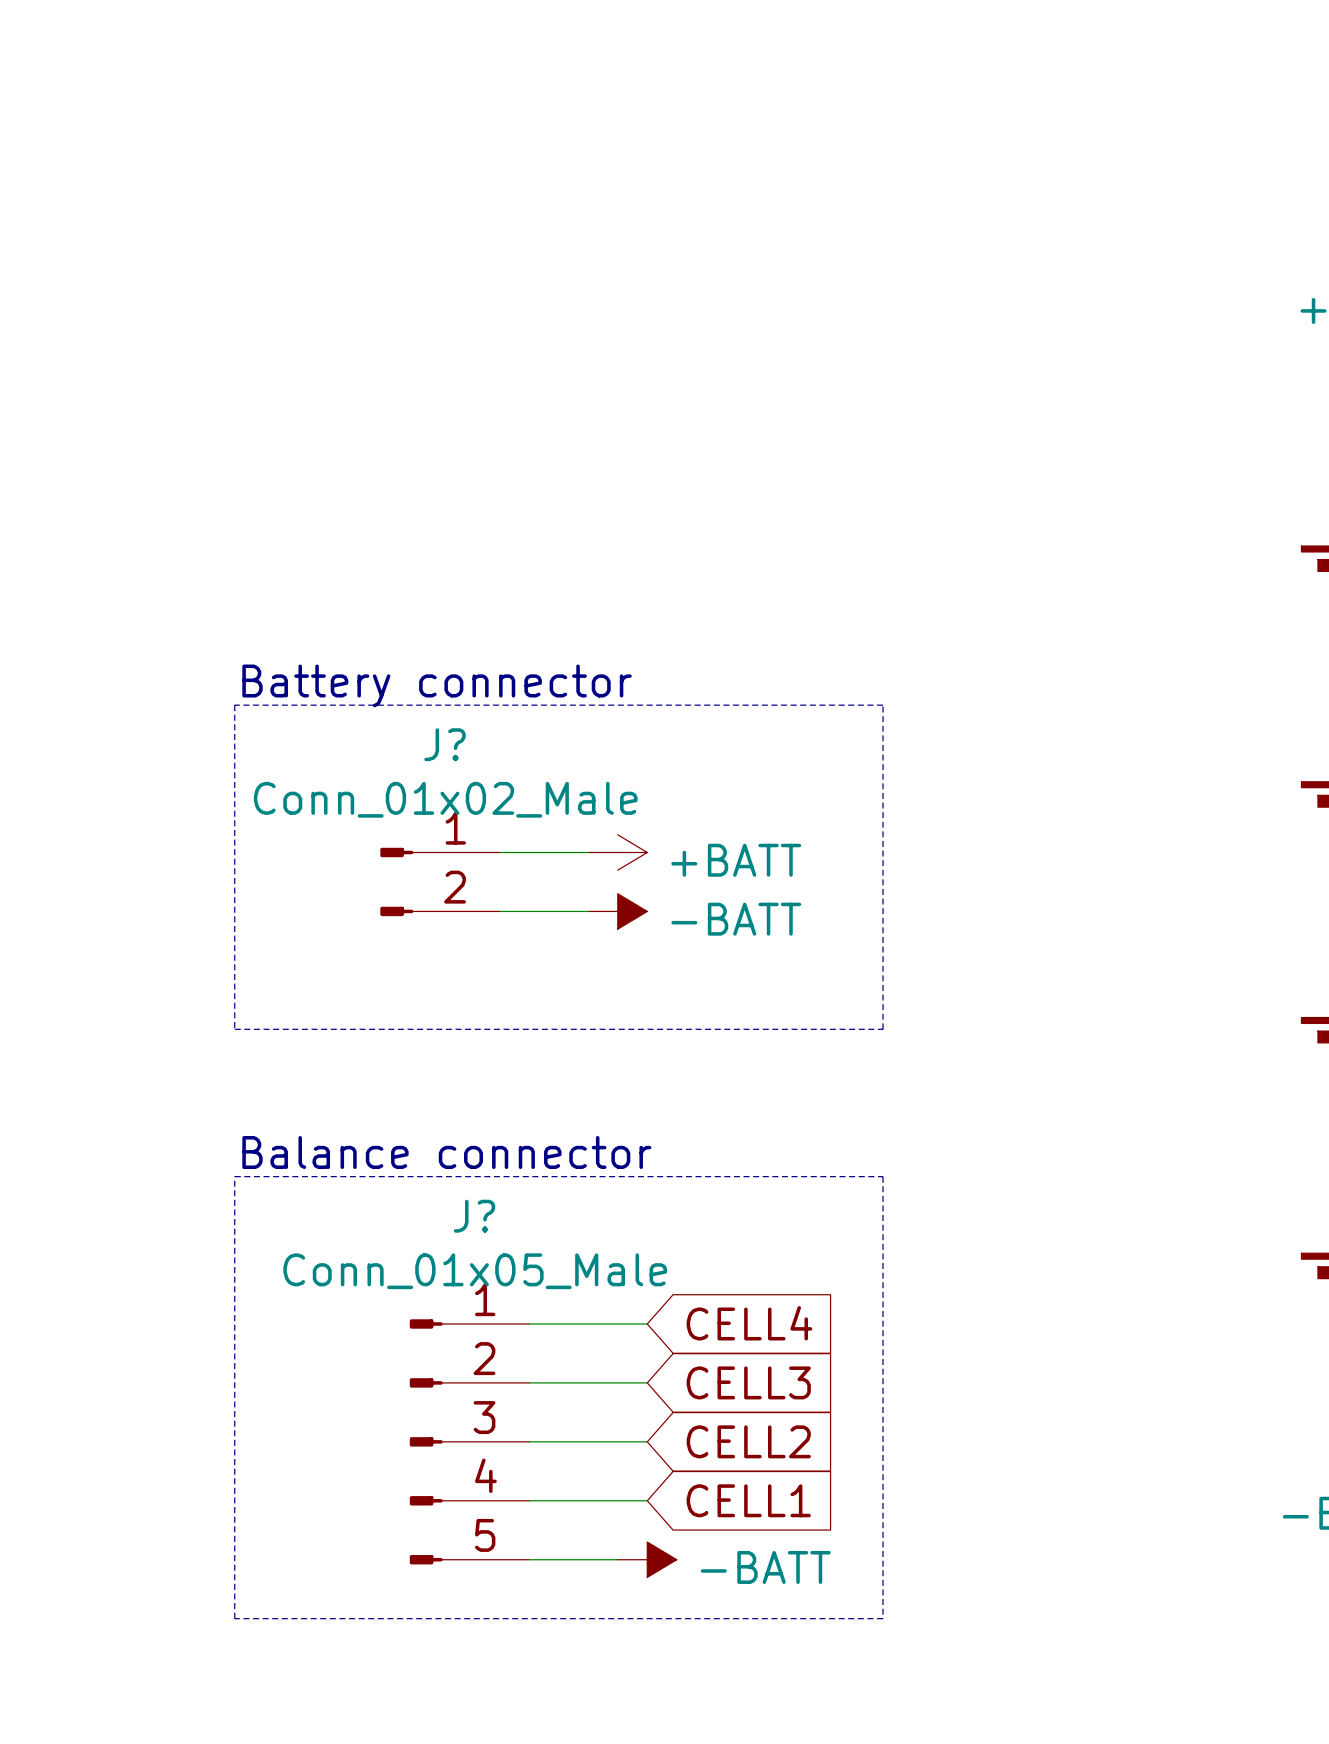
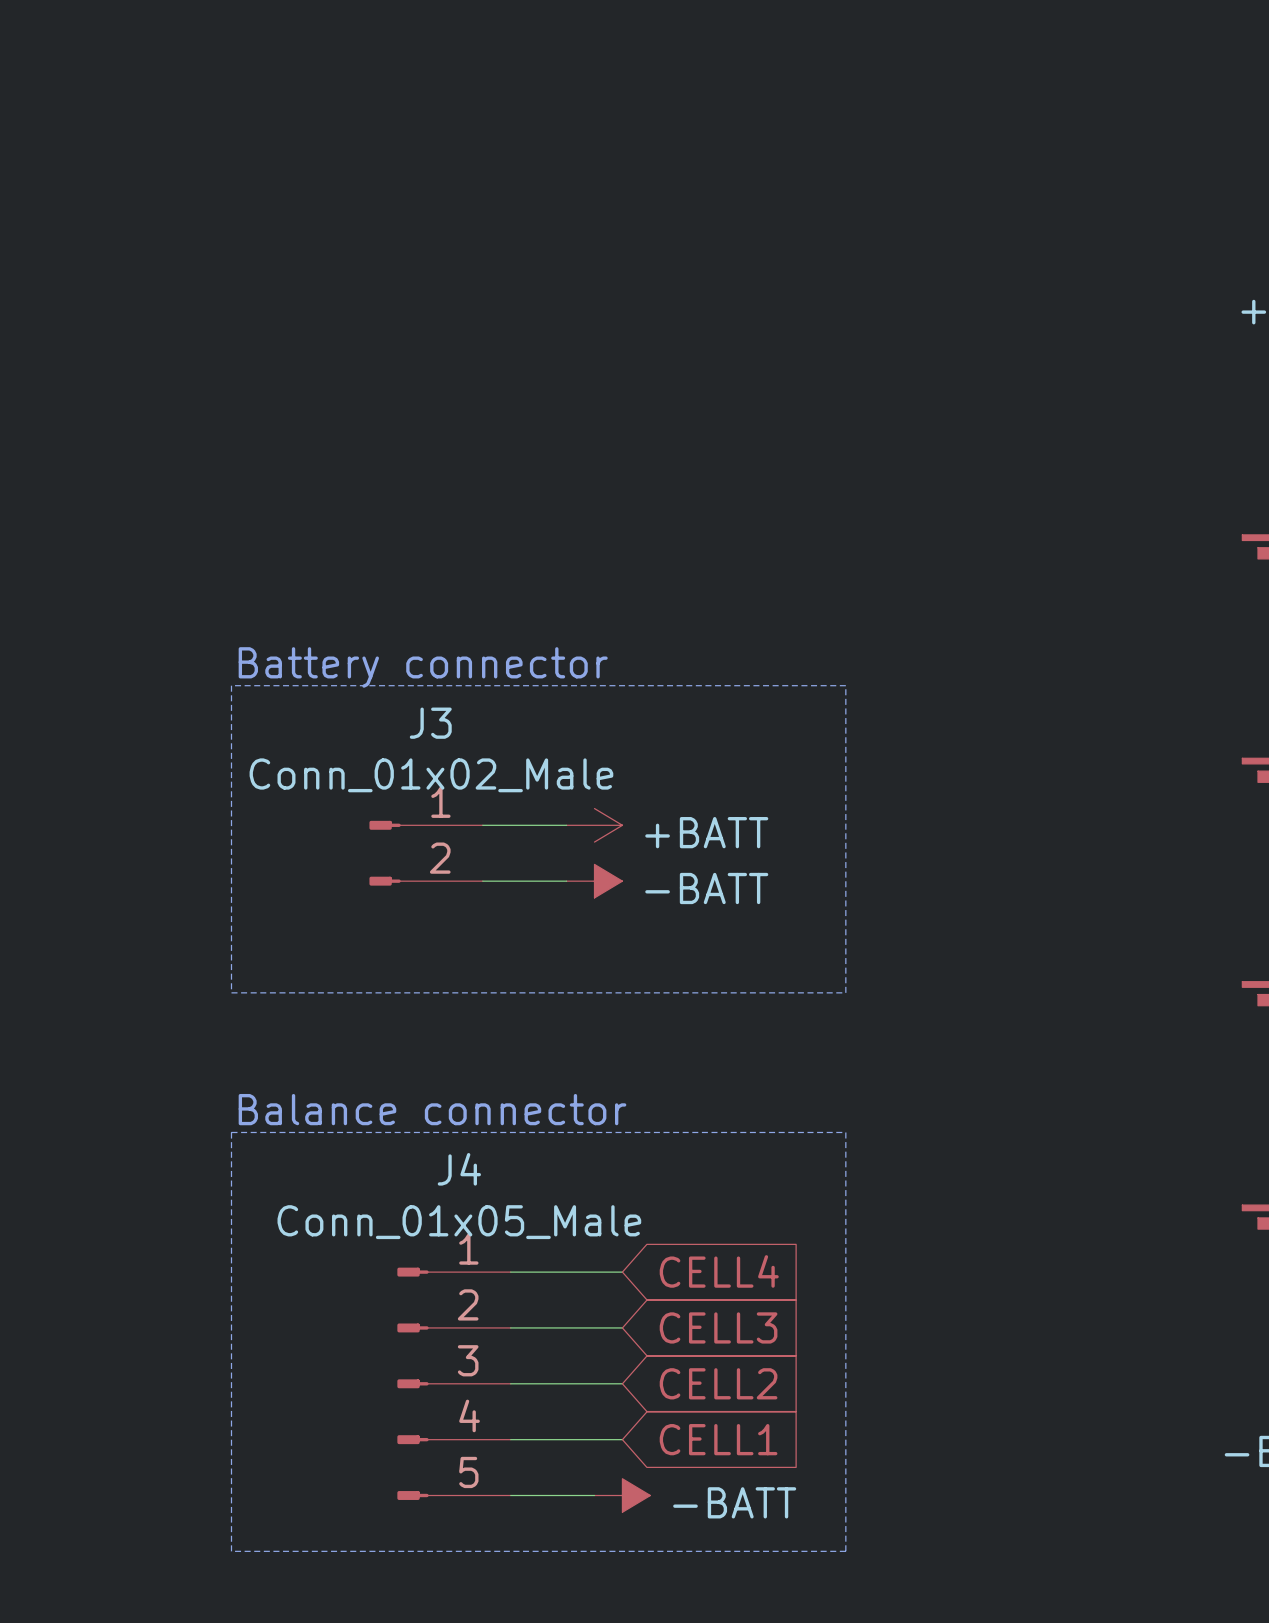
J? name: J? (445, 744) -> J3 (430, 723)
J? name: J? (474, 1216) -> J4 (459, 1169)

